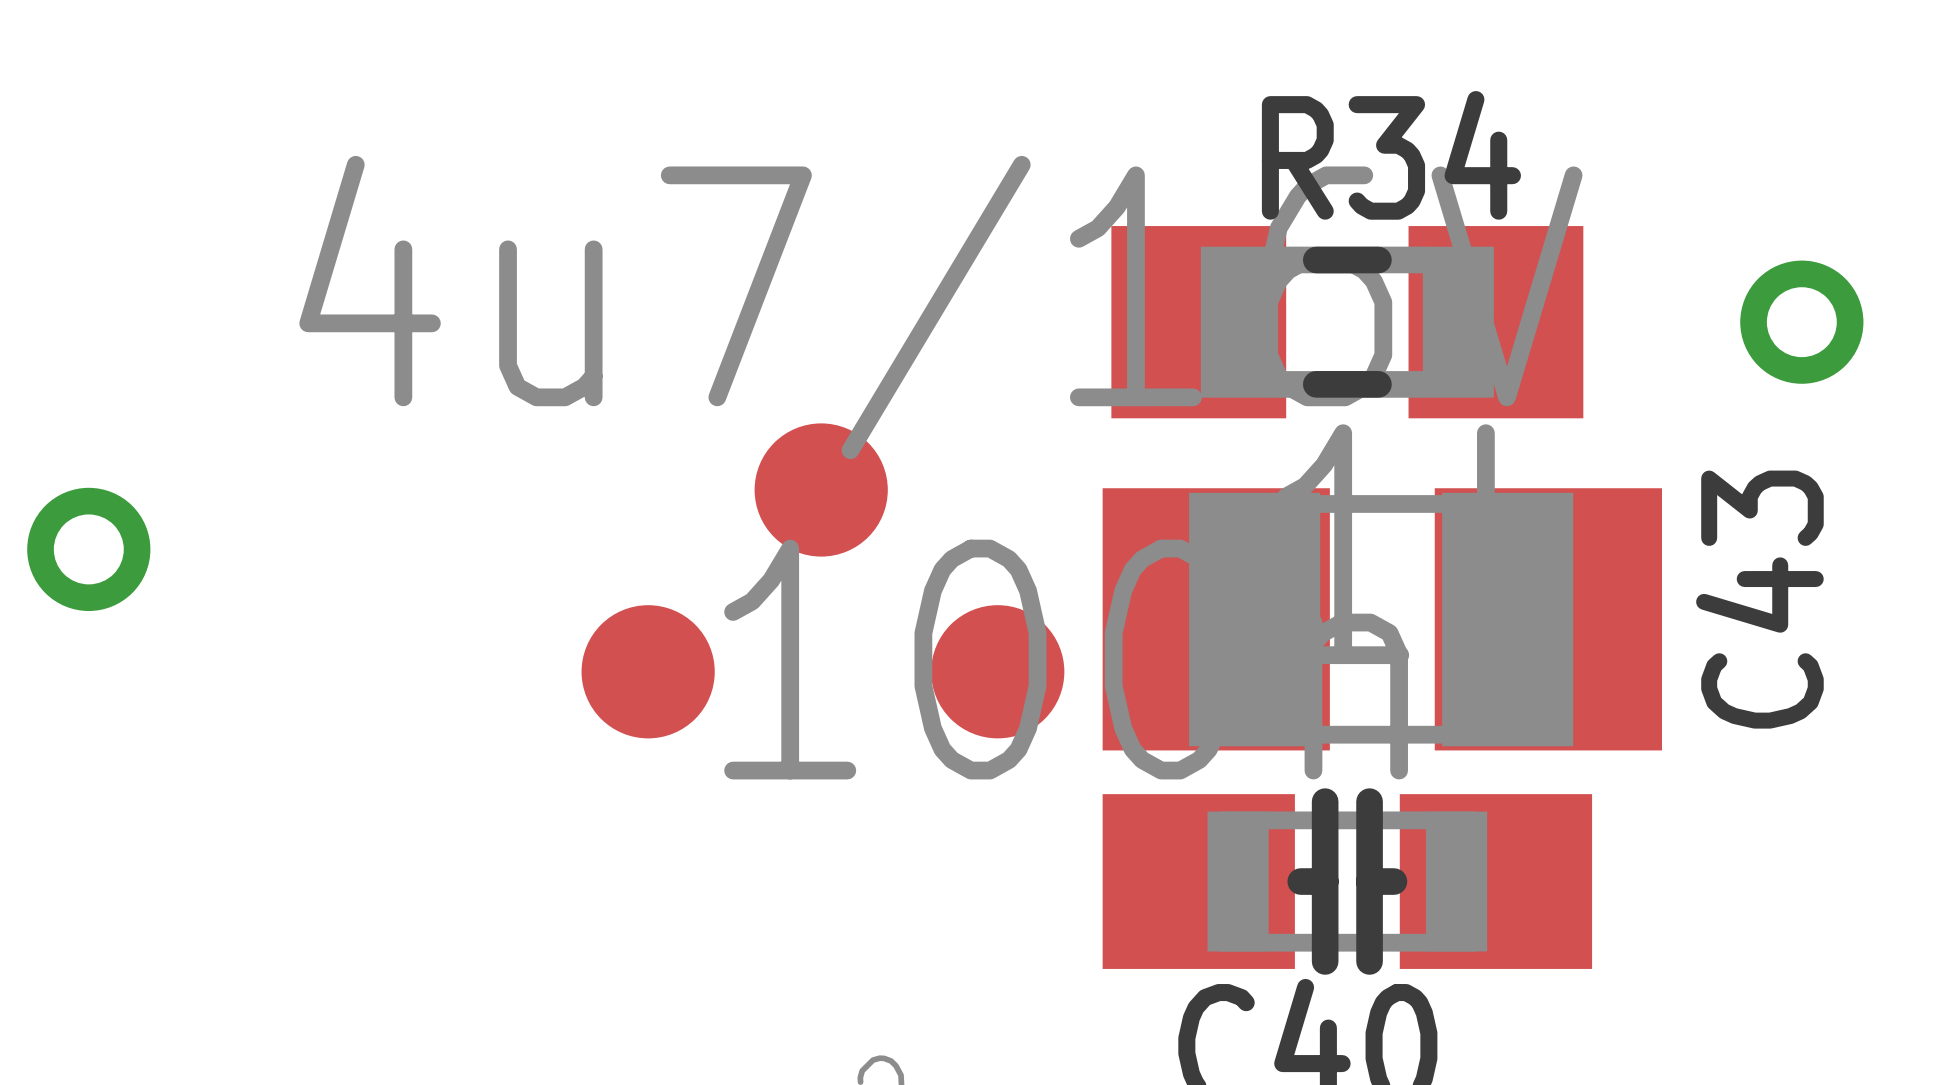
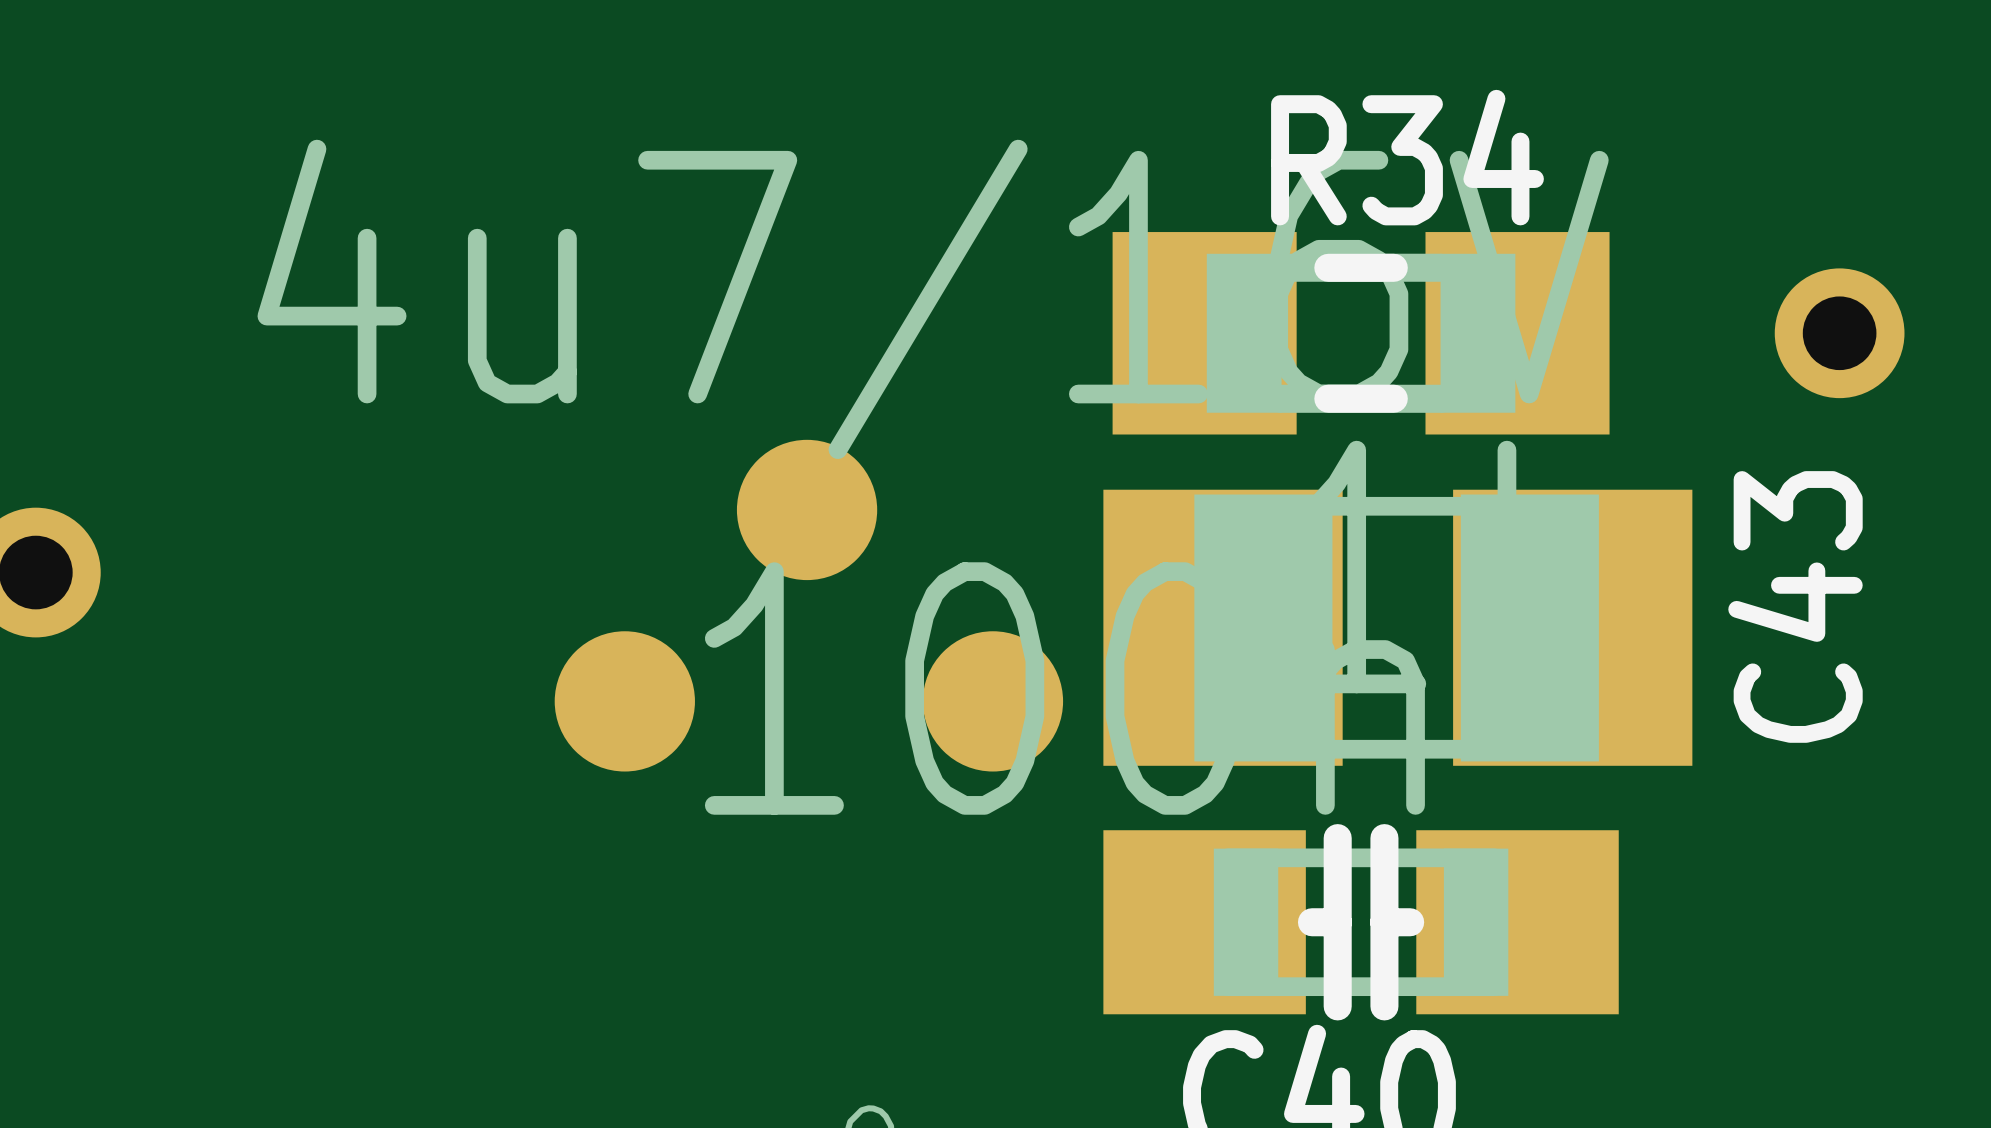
C43 position: (1382, 619) -> (1397, 627)

